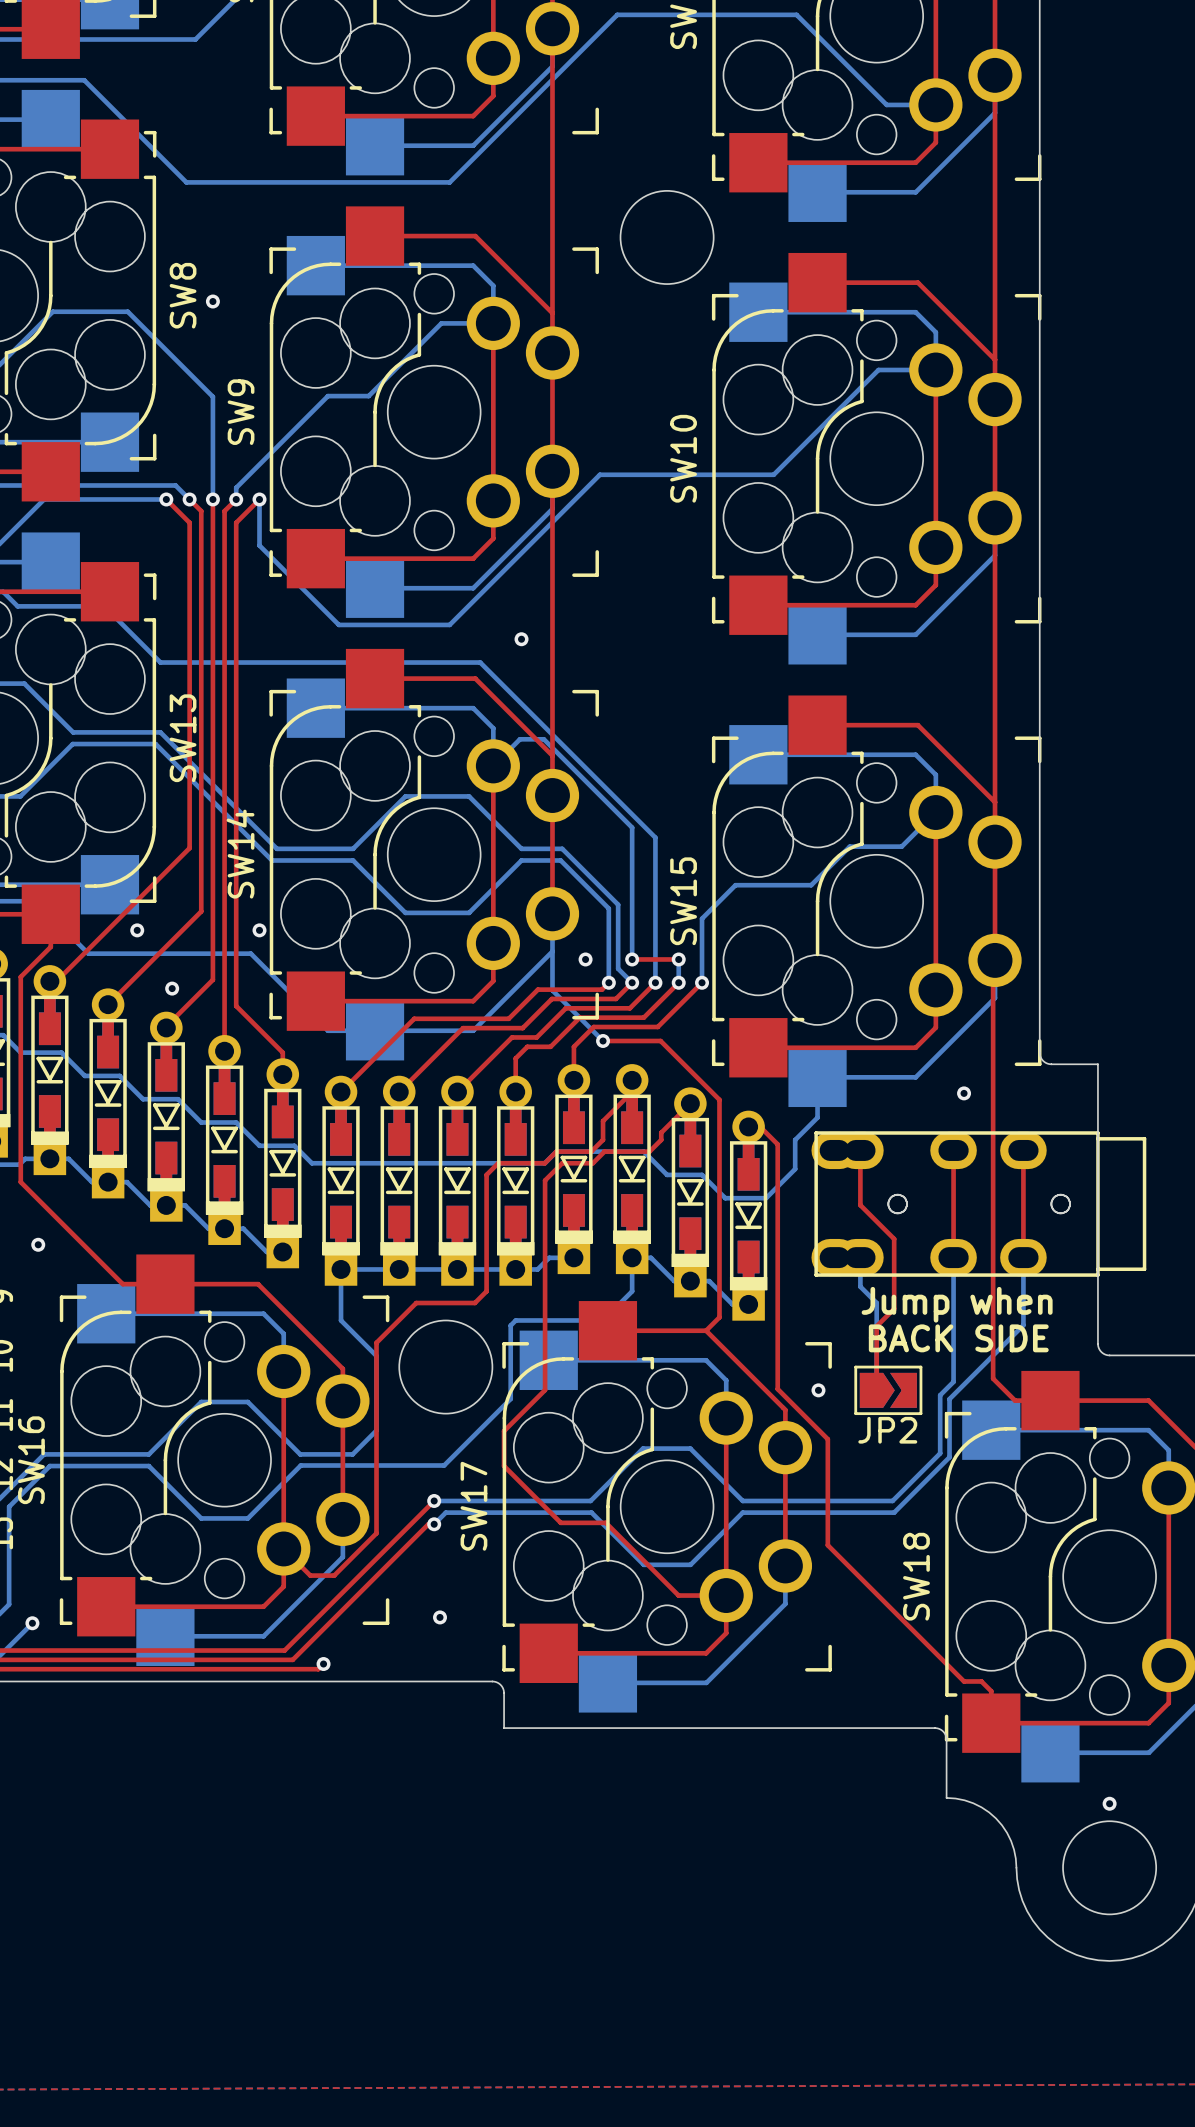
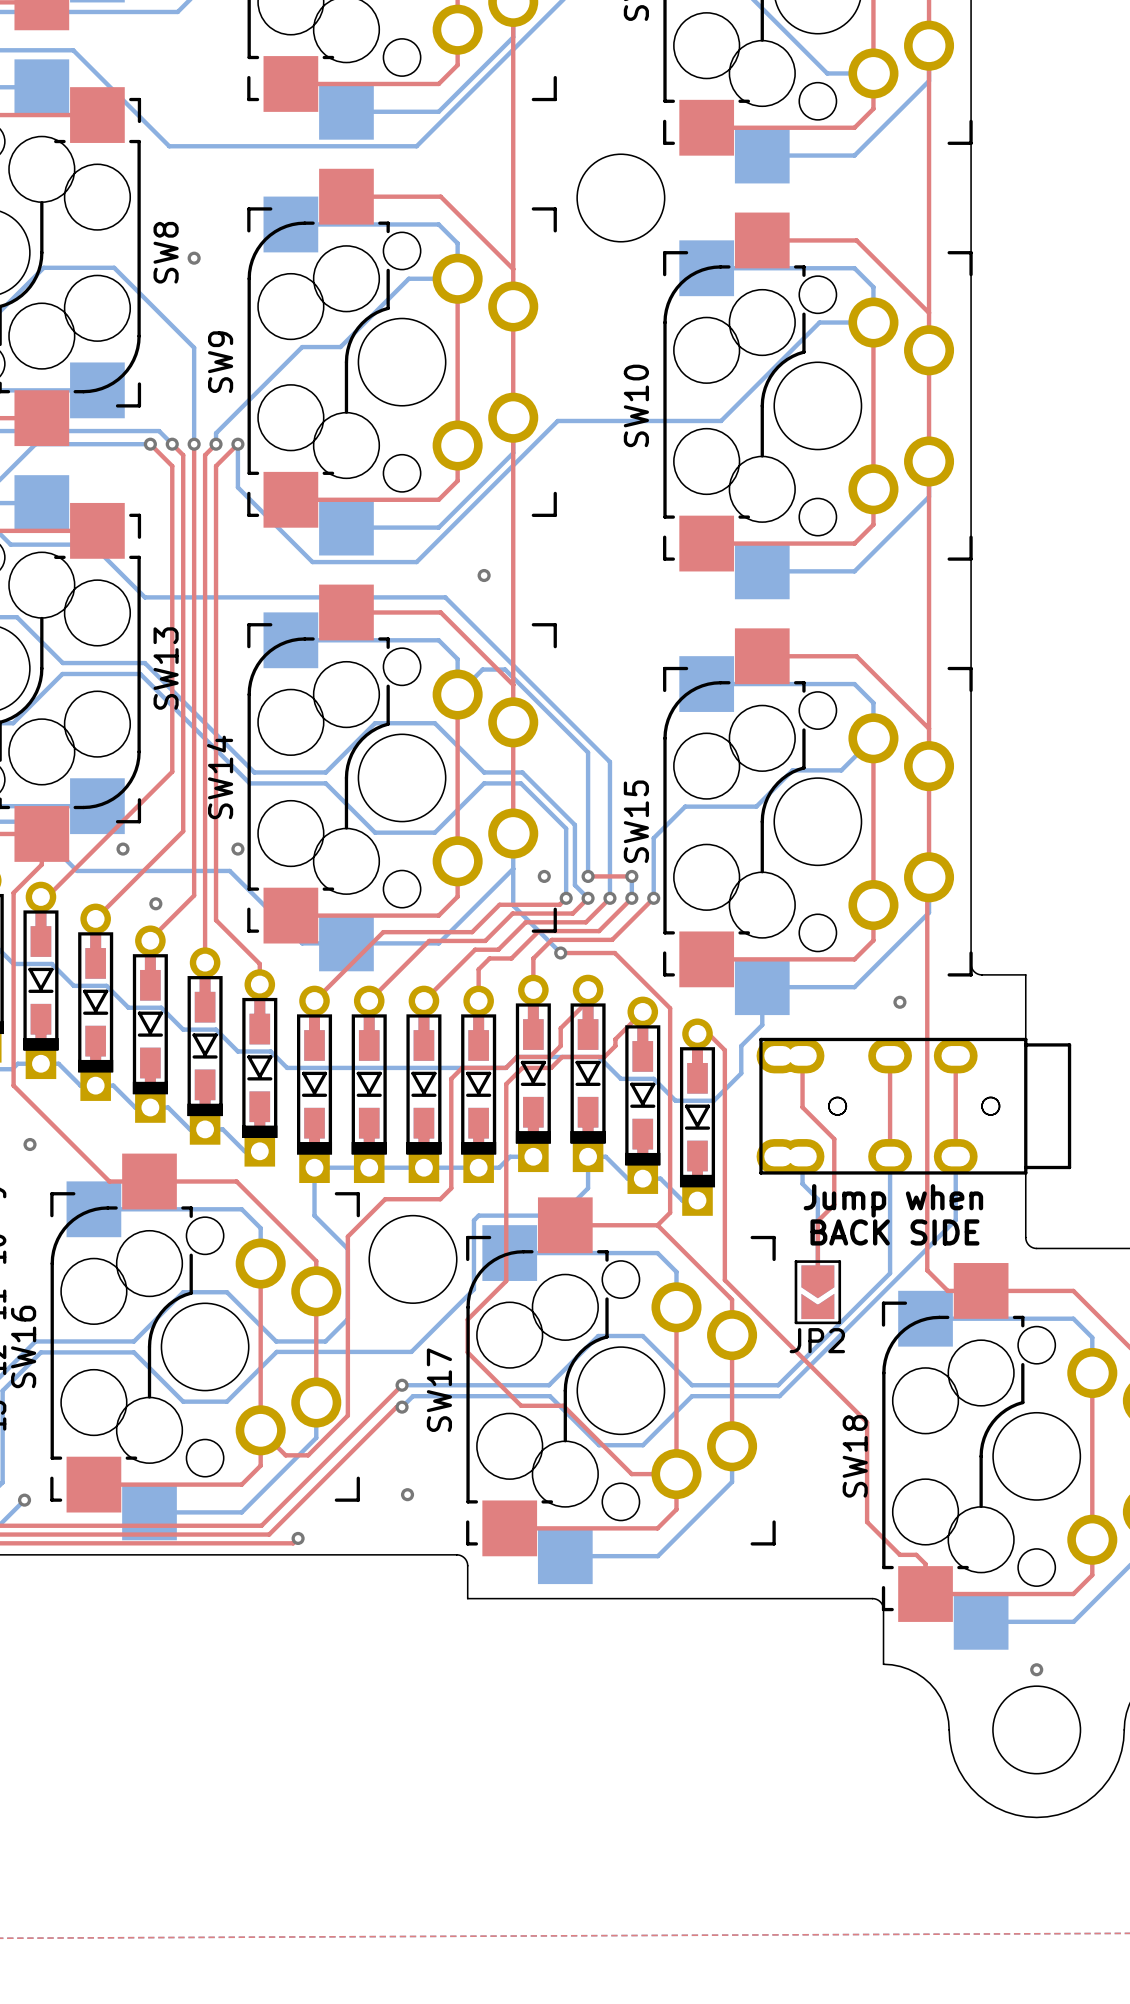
via: (818, 1390) -> none
JP2 rotation: 0° (888, 1390) -> 90° clockwise (817, 1292)
bottom track: (940, 1395) (940, 1453) (892, 1500) (834, 1500) -> (877, 1285) (778, 1385)
bottom track: (949, 1399) (949, 1457) (894, 1512) (836, 1512) -> (886, 1289) (779, 1396)
top track: (827, 1439) (827, 1545) (929, 1646) -> (771, 1327) (867, 1422) (867, 1522)

